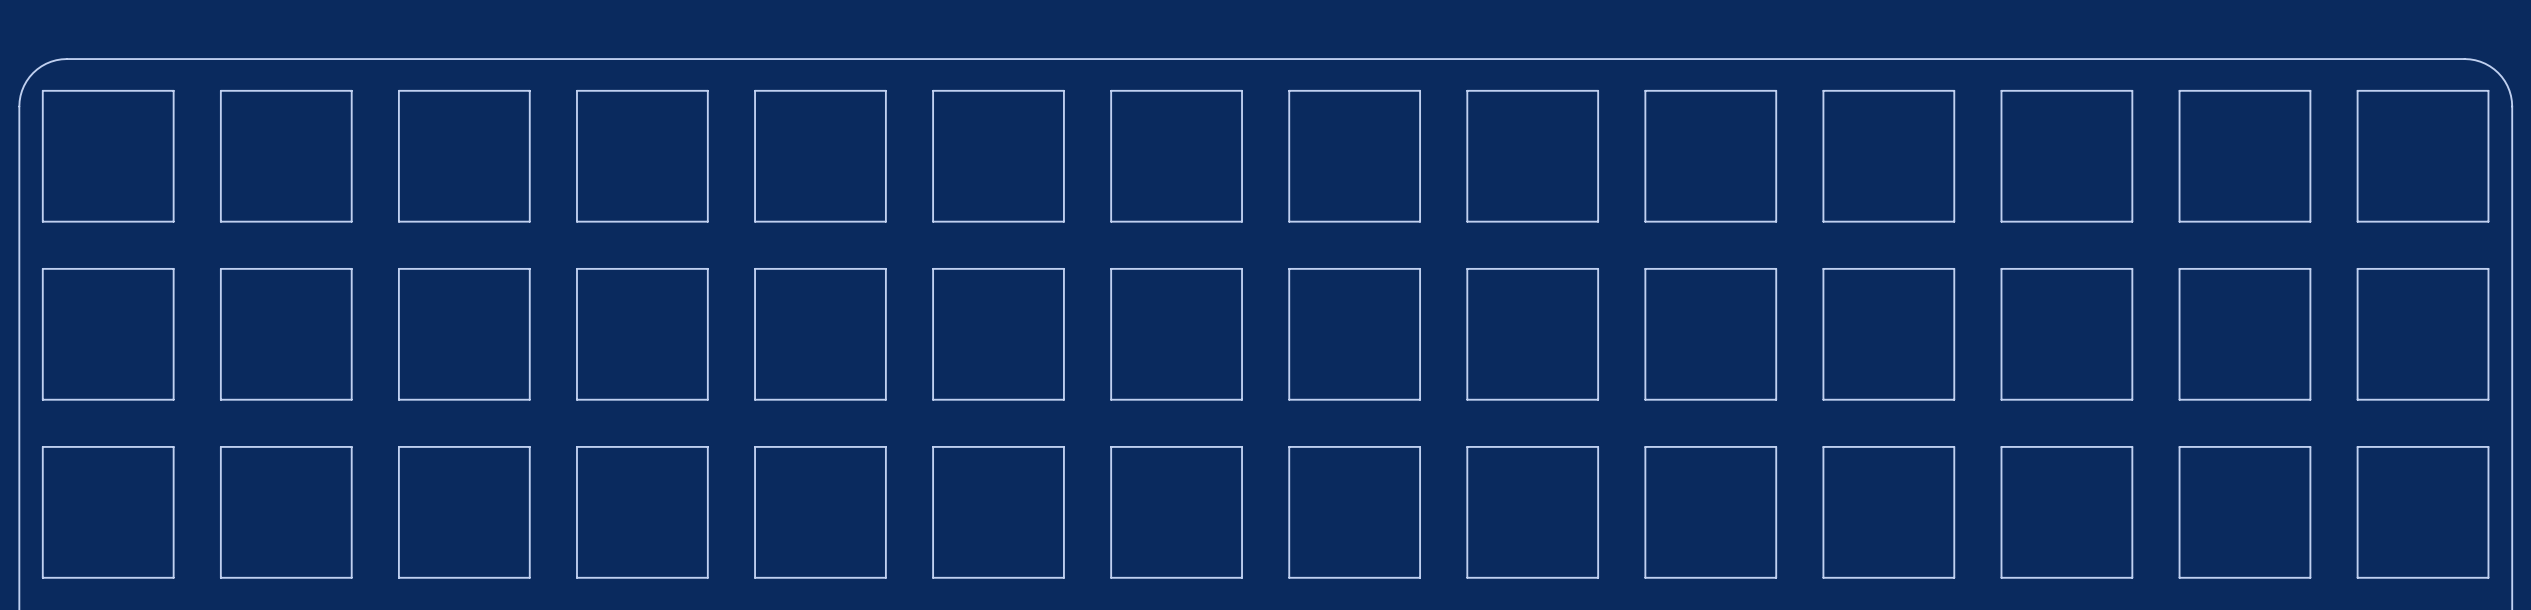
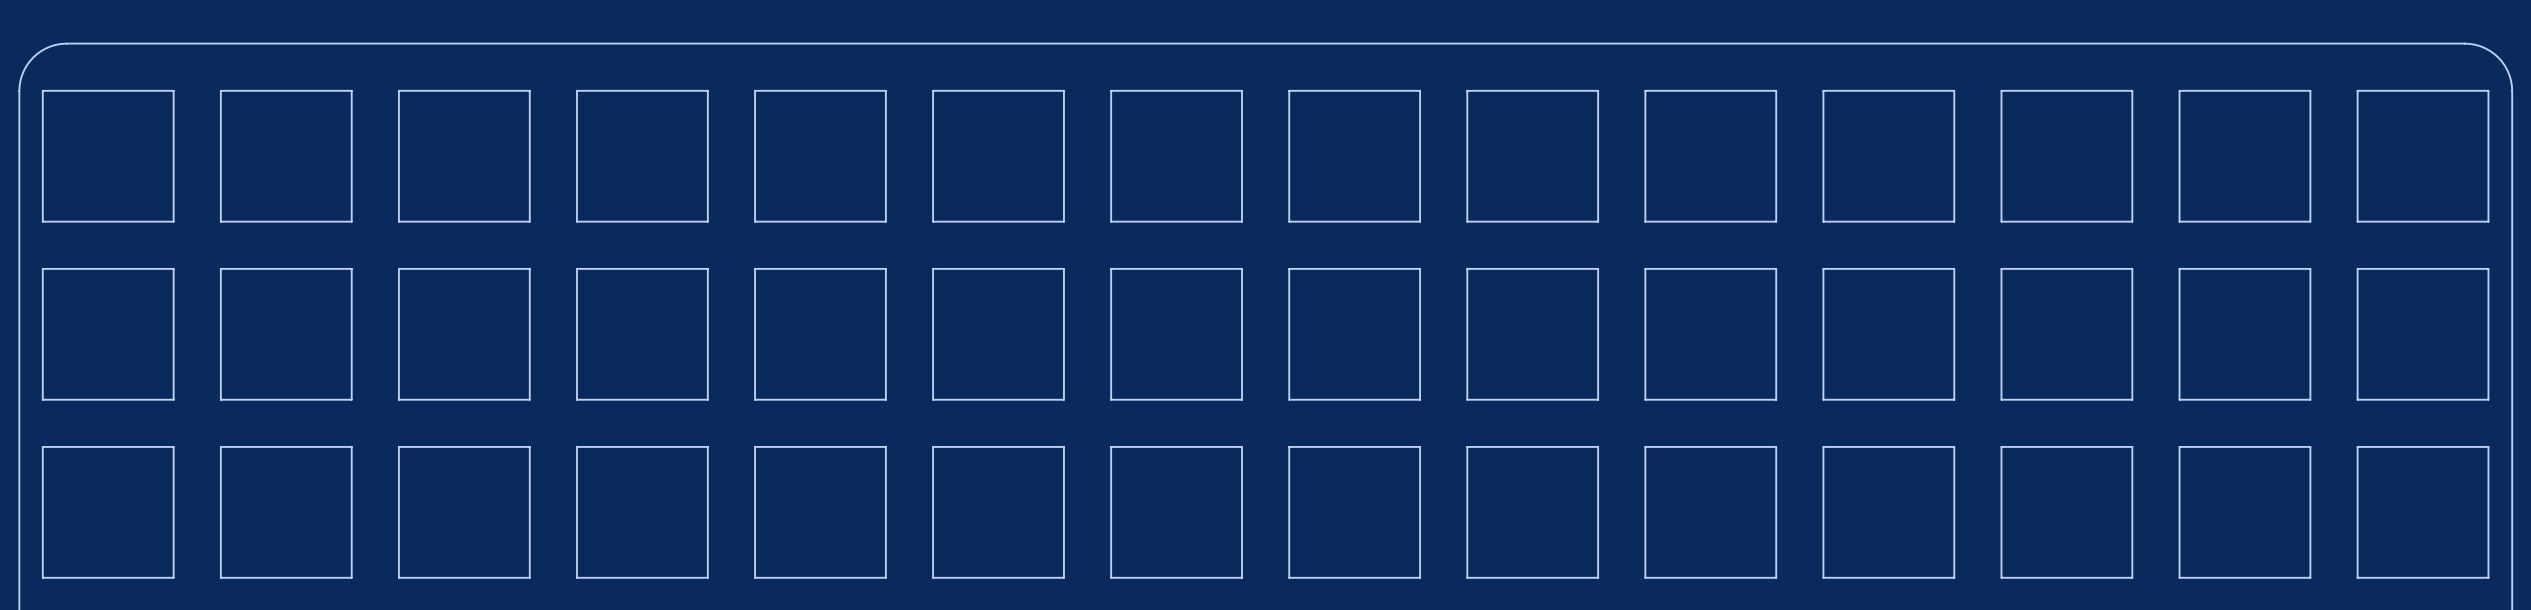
board edge: (19, 106) (24, 85) (33, 72) (51, 61) (66, 59) (2464, 59) (2485, 63) (2498, 72) (2507, 85) (2512, 106) -> (19, 106) (20, 80) (29, 61) (46, 48) (66, 43) (2464, 43) (2485, 48) (2501, 61) (2511, 80) (2512, 106)

